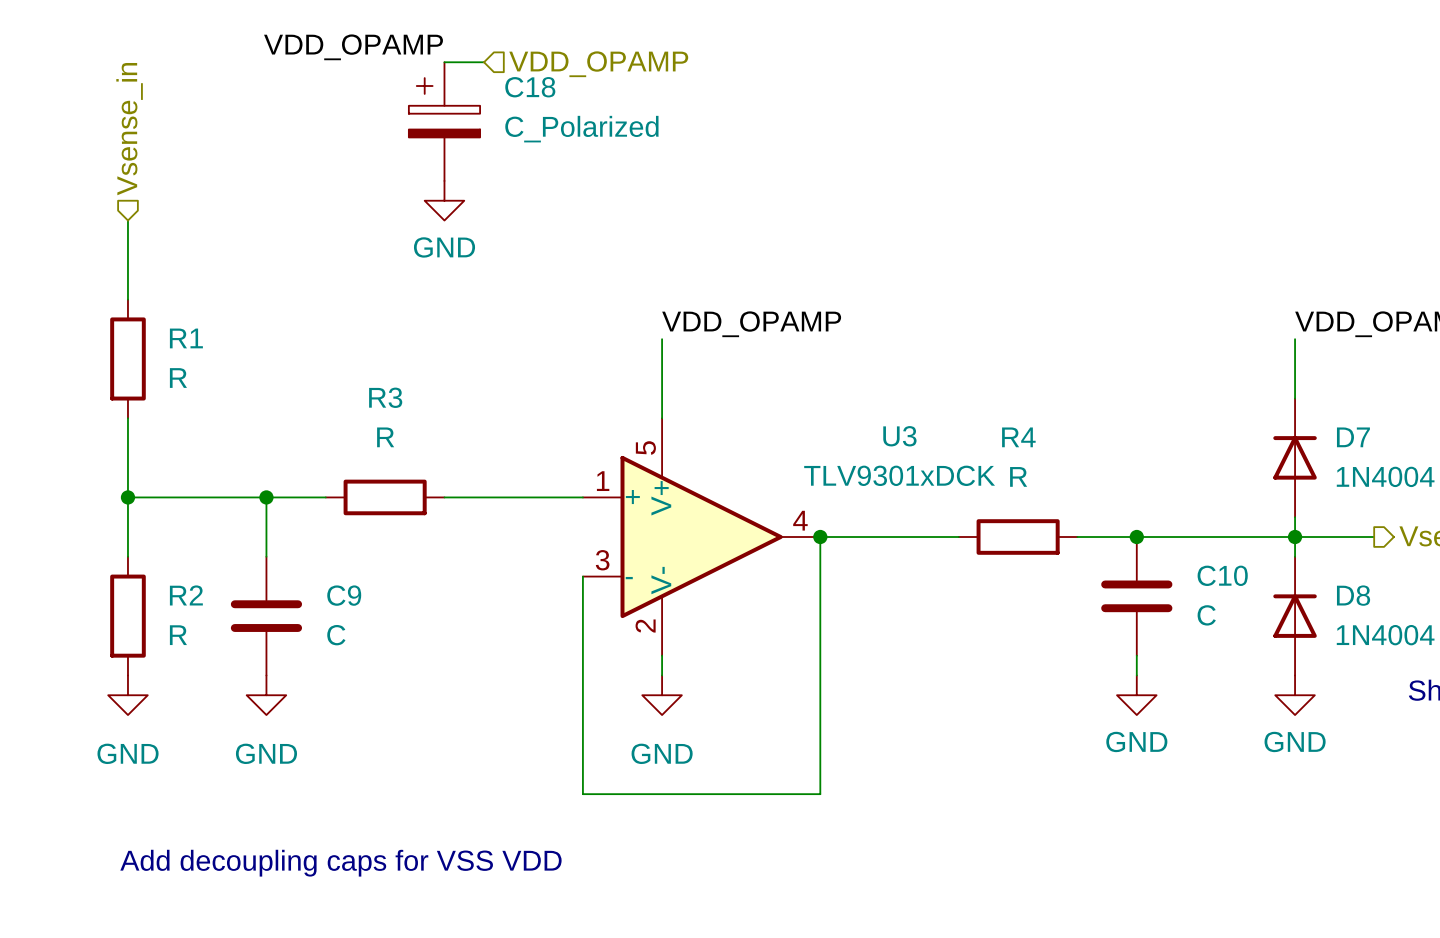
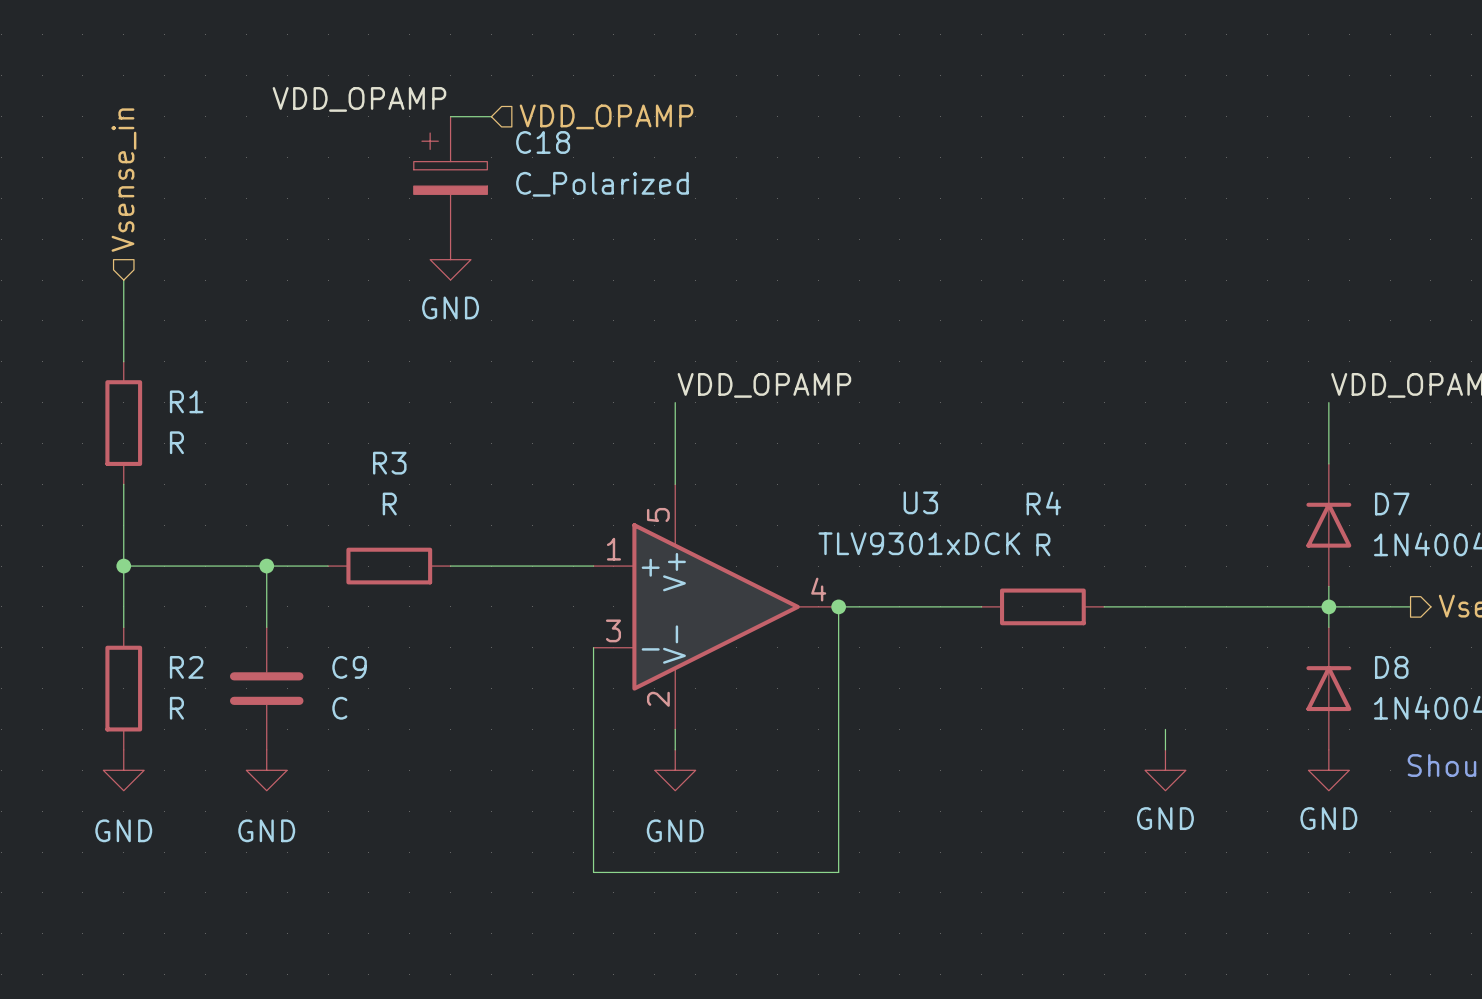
junction: (1136, 537) -> none
C10: C (1136, 596) -> none
text: Add decoupling caps for VSS VDD (340, 863) -> none

